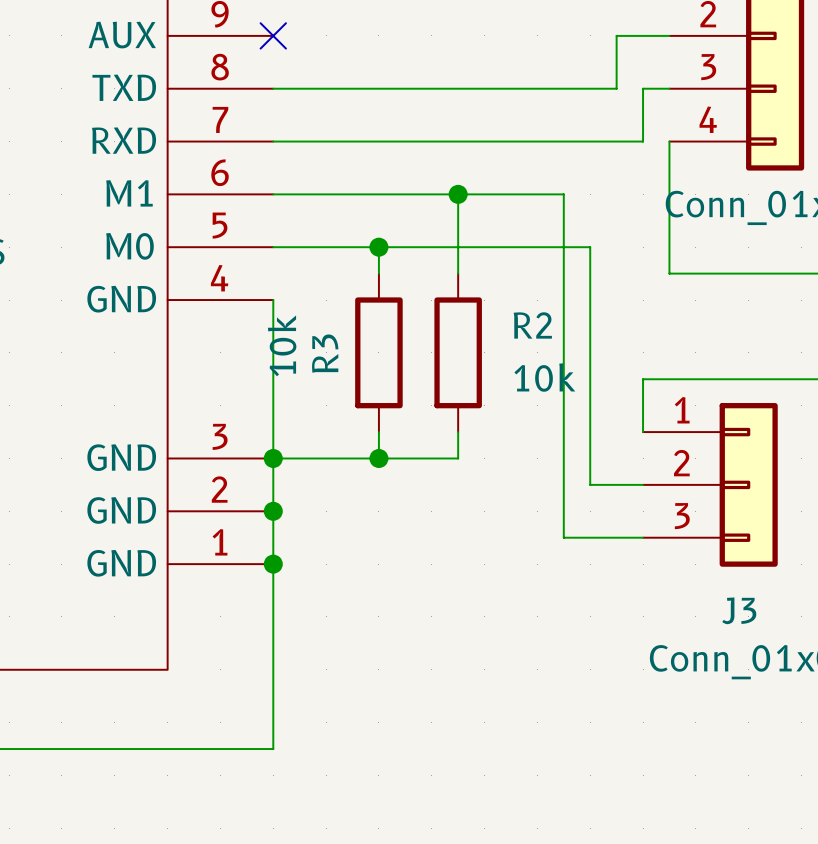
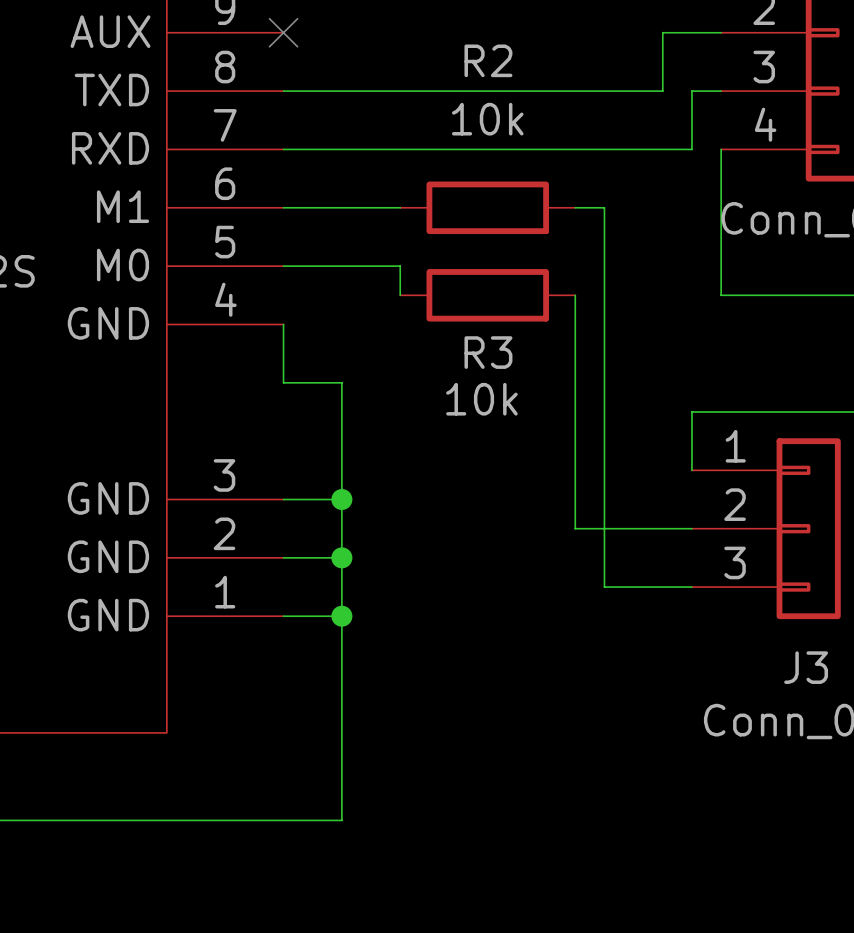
wire: (378, 194) (537, 194) -> none
wire: (458, 194) (458, 273) -> none
junction: (458, 194) -> none
wire: (378, 247) (590, 247) (590, 484) -> (575, 295) (575, 528) (633, 528)
junction: (378, 247) -> none
R2 name position: R2 (532, 325) -> R2 (488, 60)
R3 value position: 10k (282, 345) -> 10k (481, 399)
wire: (273, 352) (273, 749) -> (283, 382) (341, 382) (341, 820) (283, 820)
R3 rotation: 0° (378, 352) -> 90° clockwise (487, 295)
R3 position: (378, 352) -> (487, 295)
R2 rotation: 0° (458, 352) -> 90° clockwise (487, 207)
R2 position: (458, 352) -> (487, 207)
R3 name position: R3 (325, 353) -> R3 (488, 352)
R2 value position: 10k (544, 377) -> 10k (487, 119)
wire: (378, 432) (378, 458) -> none
wire: (458, 432) (458, 458) (326, 458) -> none
junction: (273, 458) -> none
junction: none -> (341, 499)
junction: (378, 458) -> none
wire: none -> (283, 557) (341, 557)
junction: (273, 511) -> none
junction: none -> (341, 557)
wire: none -> (283, 616) (341, 616)
junction: (273, 564) -> none
junction: none -> (341, 616)

